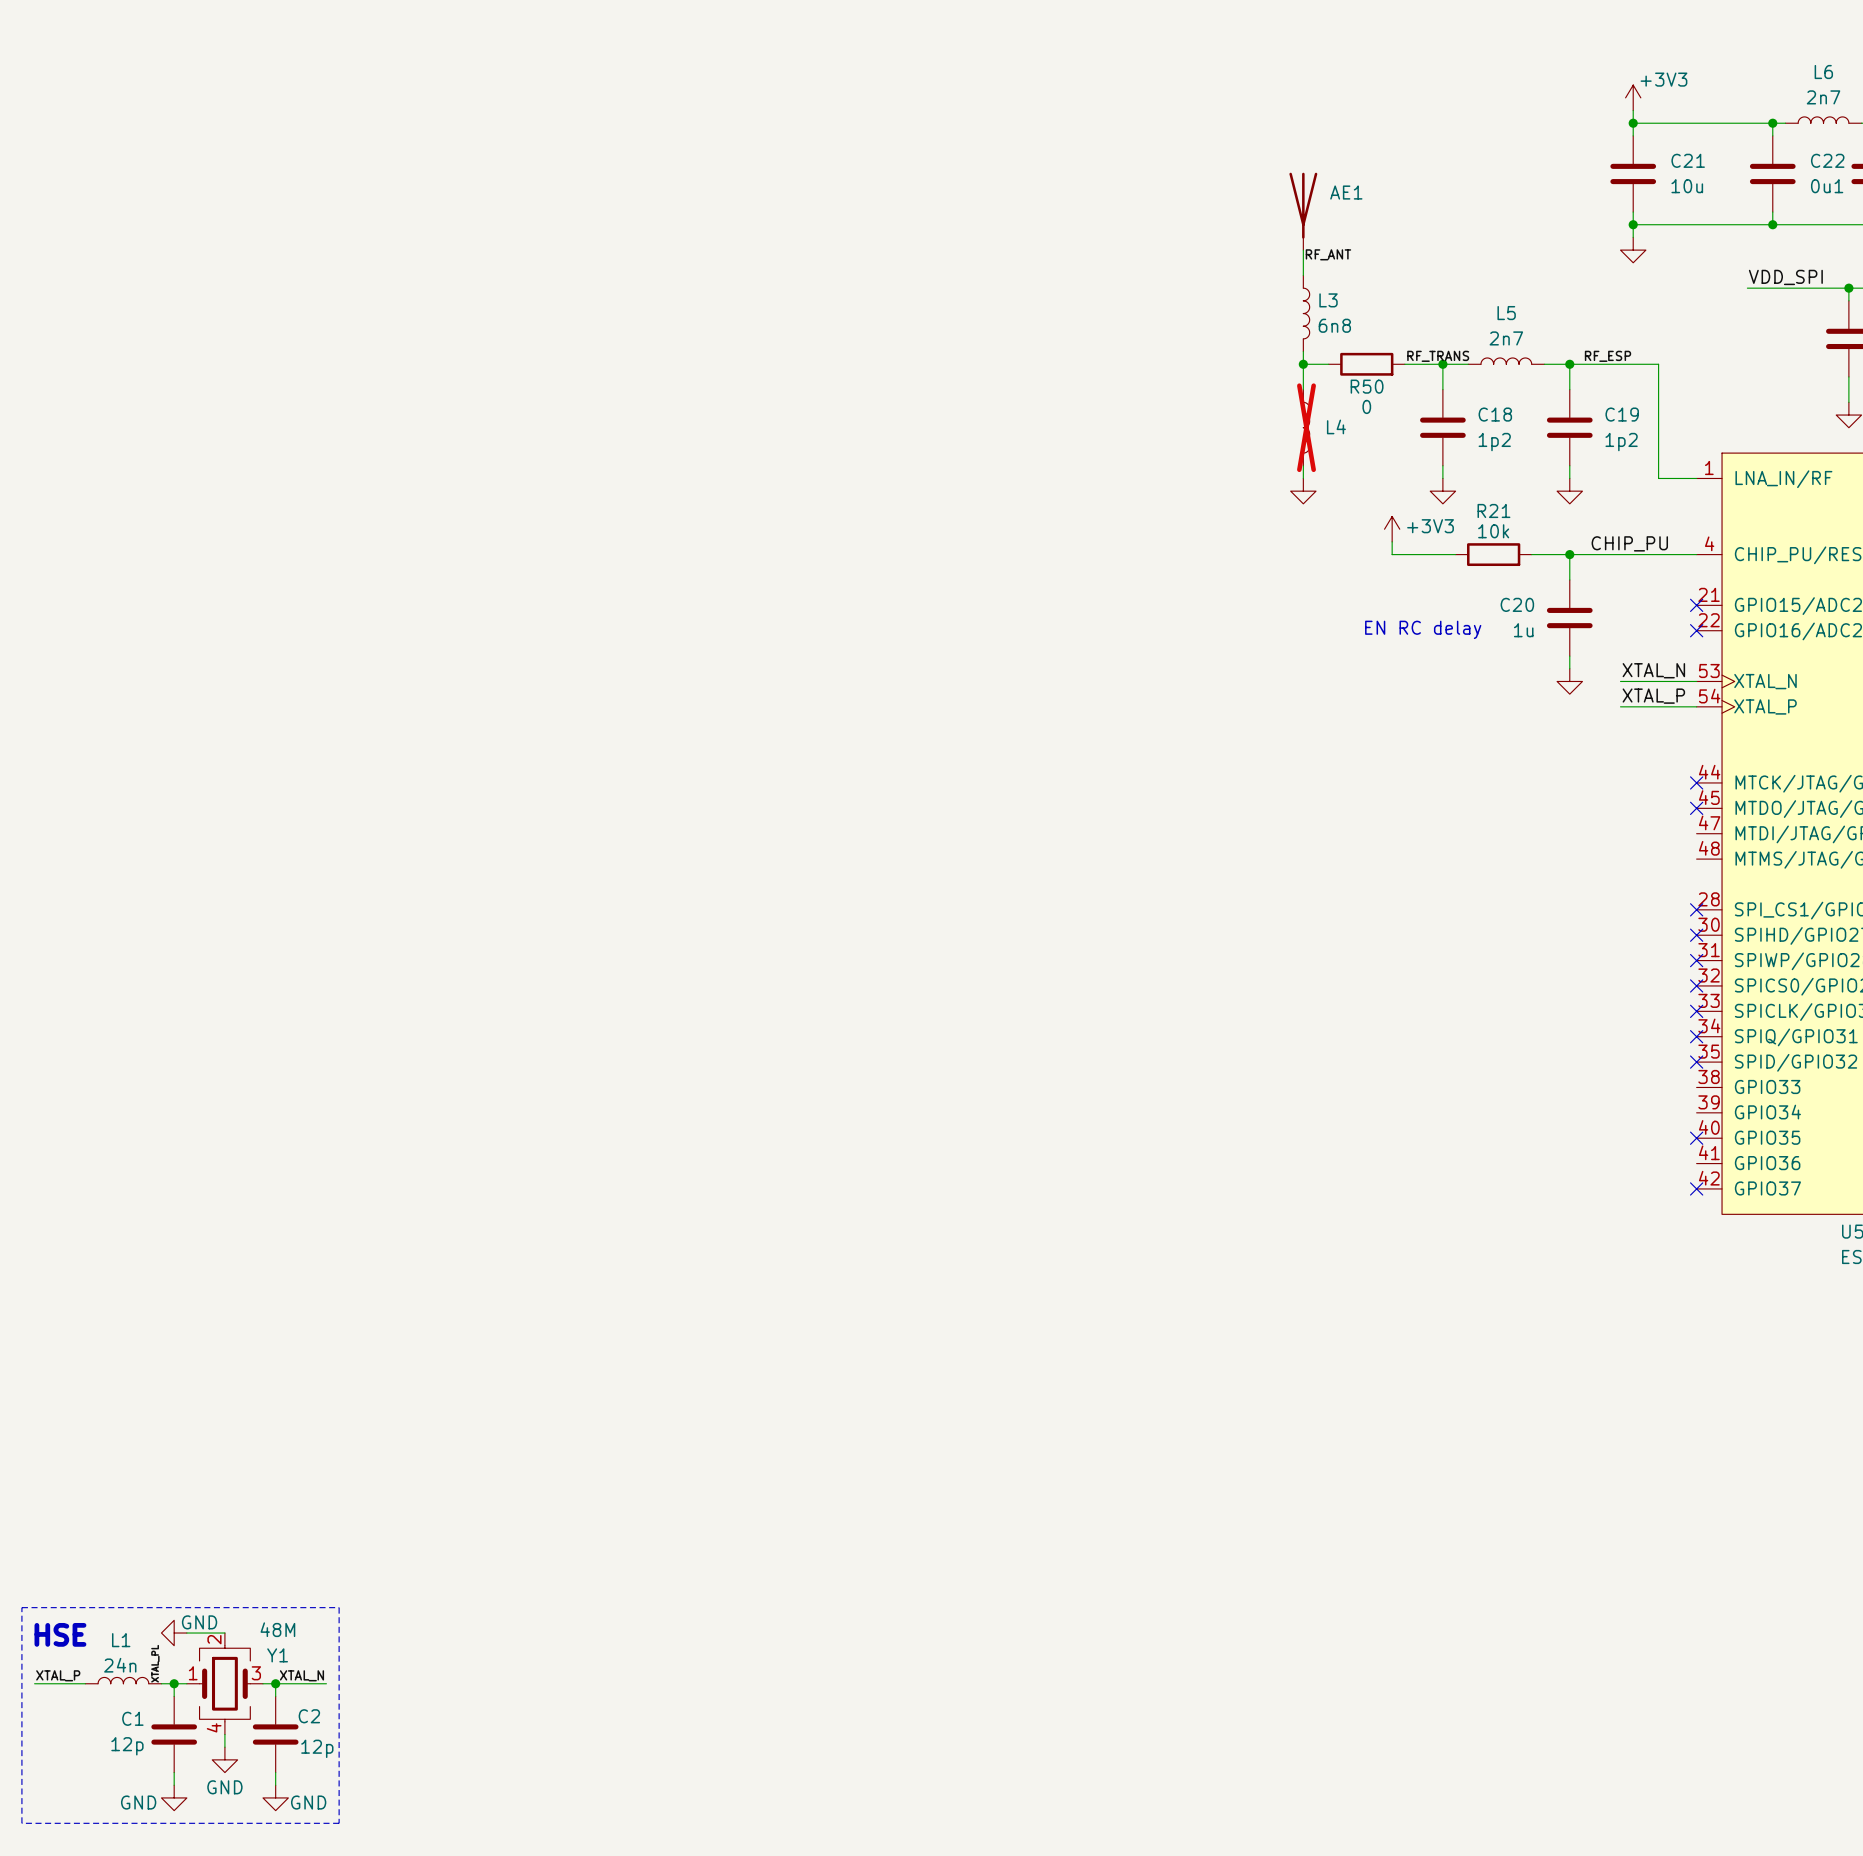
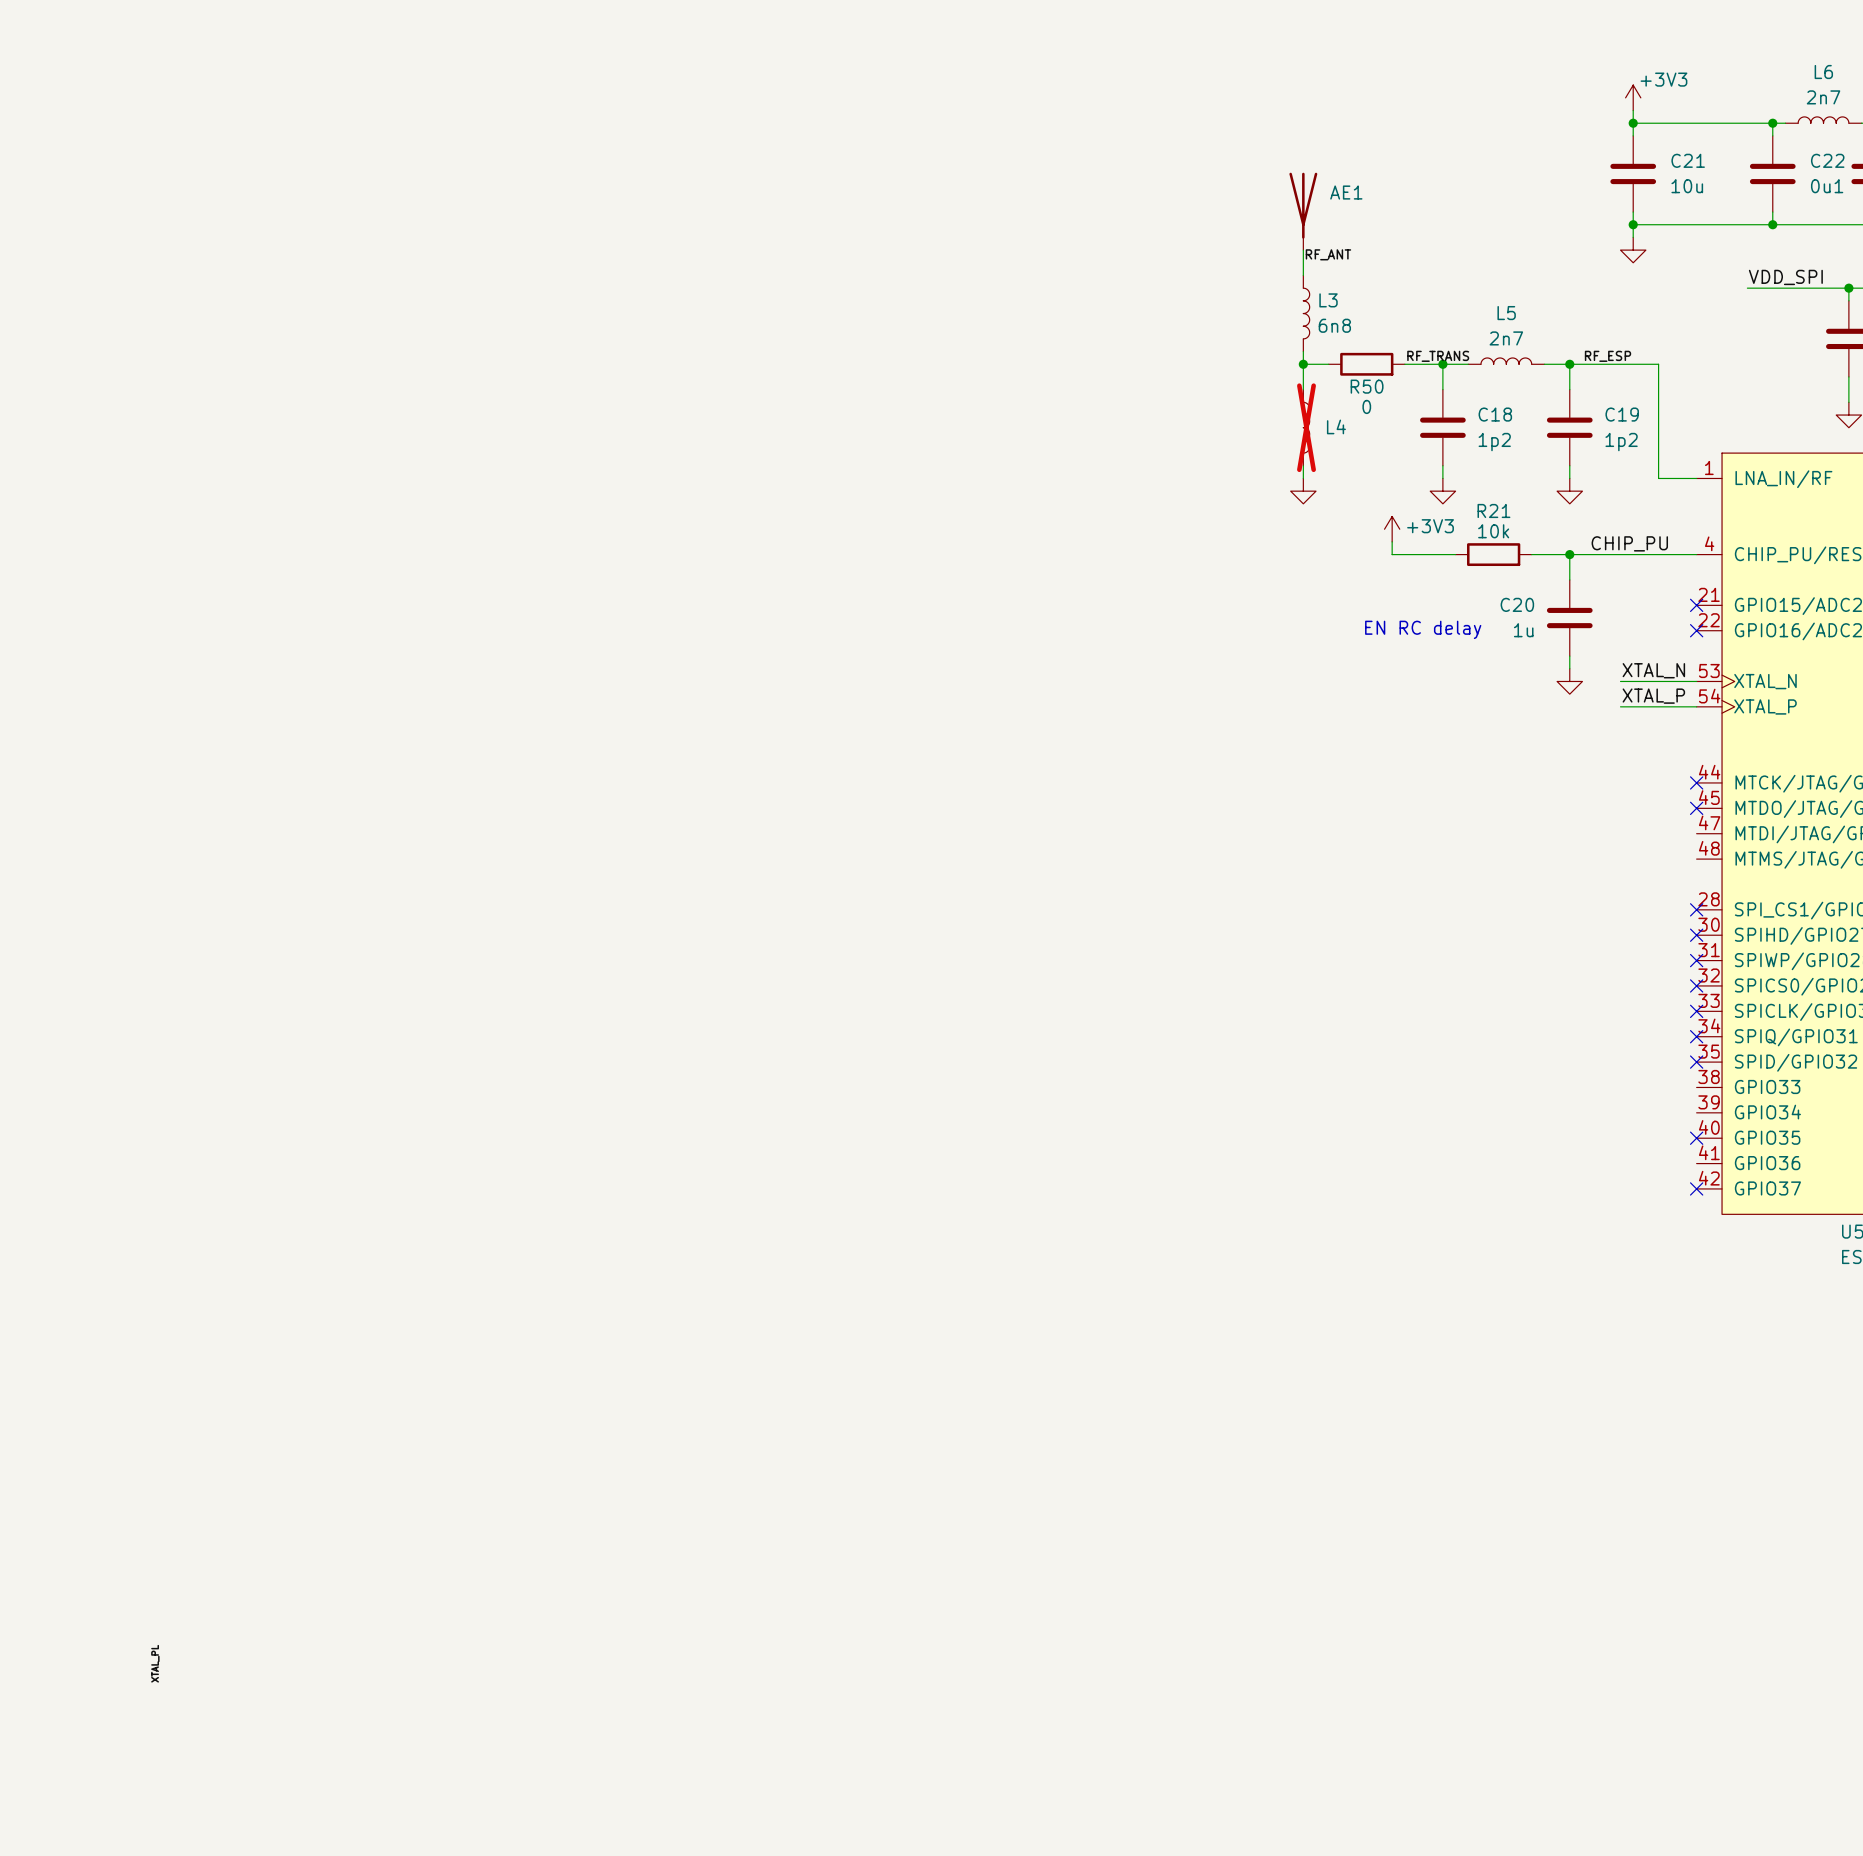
line: (21, 1607) (339, 1607) (339, 1823) (21, 1823) (21, 1607) -> none
power symbol: GND (174, 1633) -> none
wire: (186, 1633) (224, 1633) -> none
text: HSE (60, 1634) -> none
label: XTAL_P (58, 1675) -> none
label: XTAL_N (301, 1675) -> none
L1: 24n (123, 1680) -> none
wire: (34, 1683) (85, 1683) -> none
wire: (161, 1683) (186, 1683) -> none
wire: (174, 1683) (174, 1696) -> none
junction: (174, 1683) -> none
Y1: 48M (224, 1683) -> none
wire: (262, 1683) (326, 1683) -> none
wire: (275, 1683) (275, 1696) -> none
junction: (275, 1683) -> none
C1: 12p (174, 1734) -> none
wire: (224, 1734) (224, 1747) -> none
C2: 12p (275, 1734) -> none
power symbol: GND (224, 1759) -> none
wire: (174, 1772) (174, 1785) -> none
wire: (275, 1772) (275, 1785) -> none
power symbol: GND (174, 1797) -> none
power symbol: GND (275, 1797) -> none

